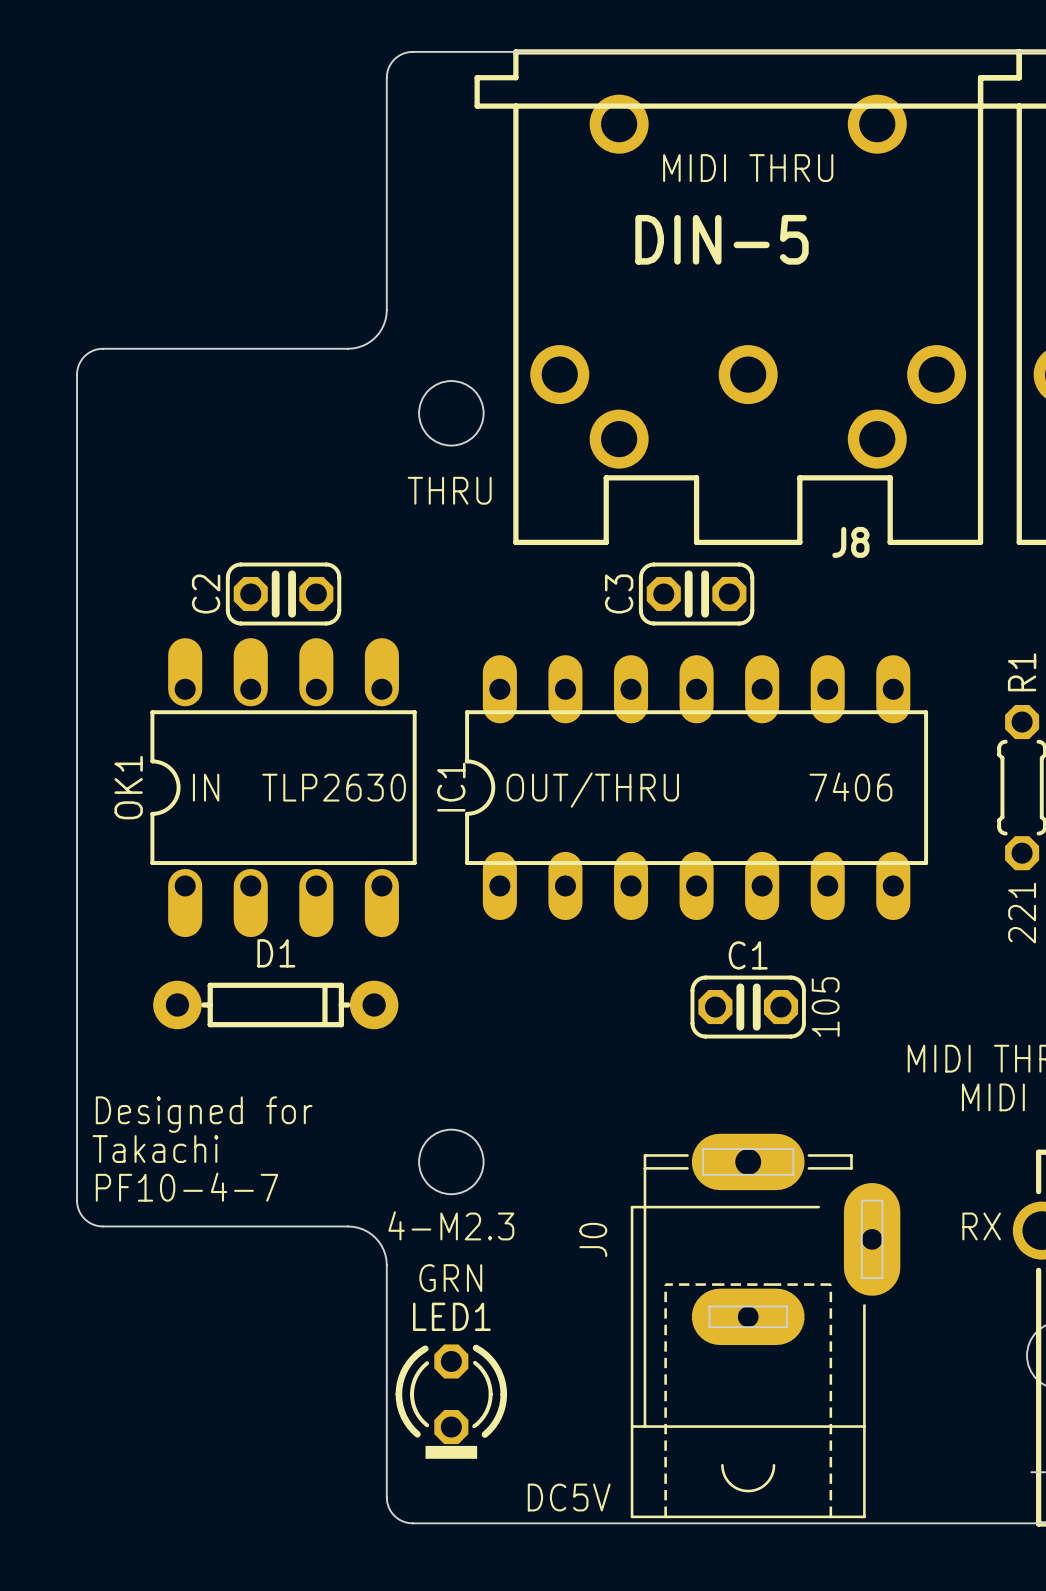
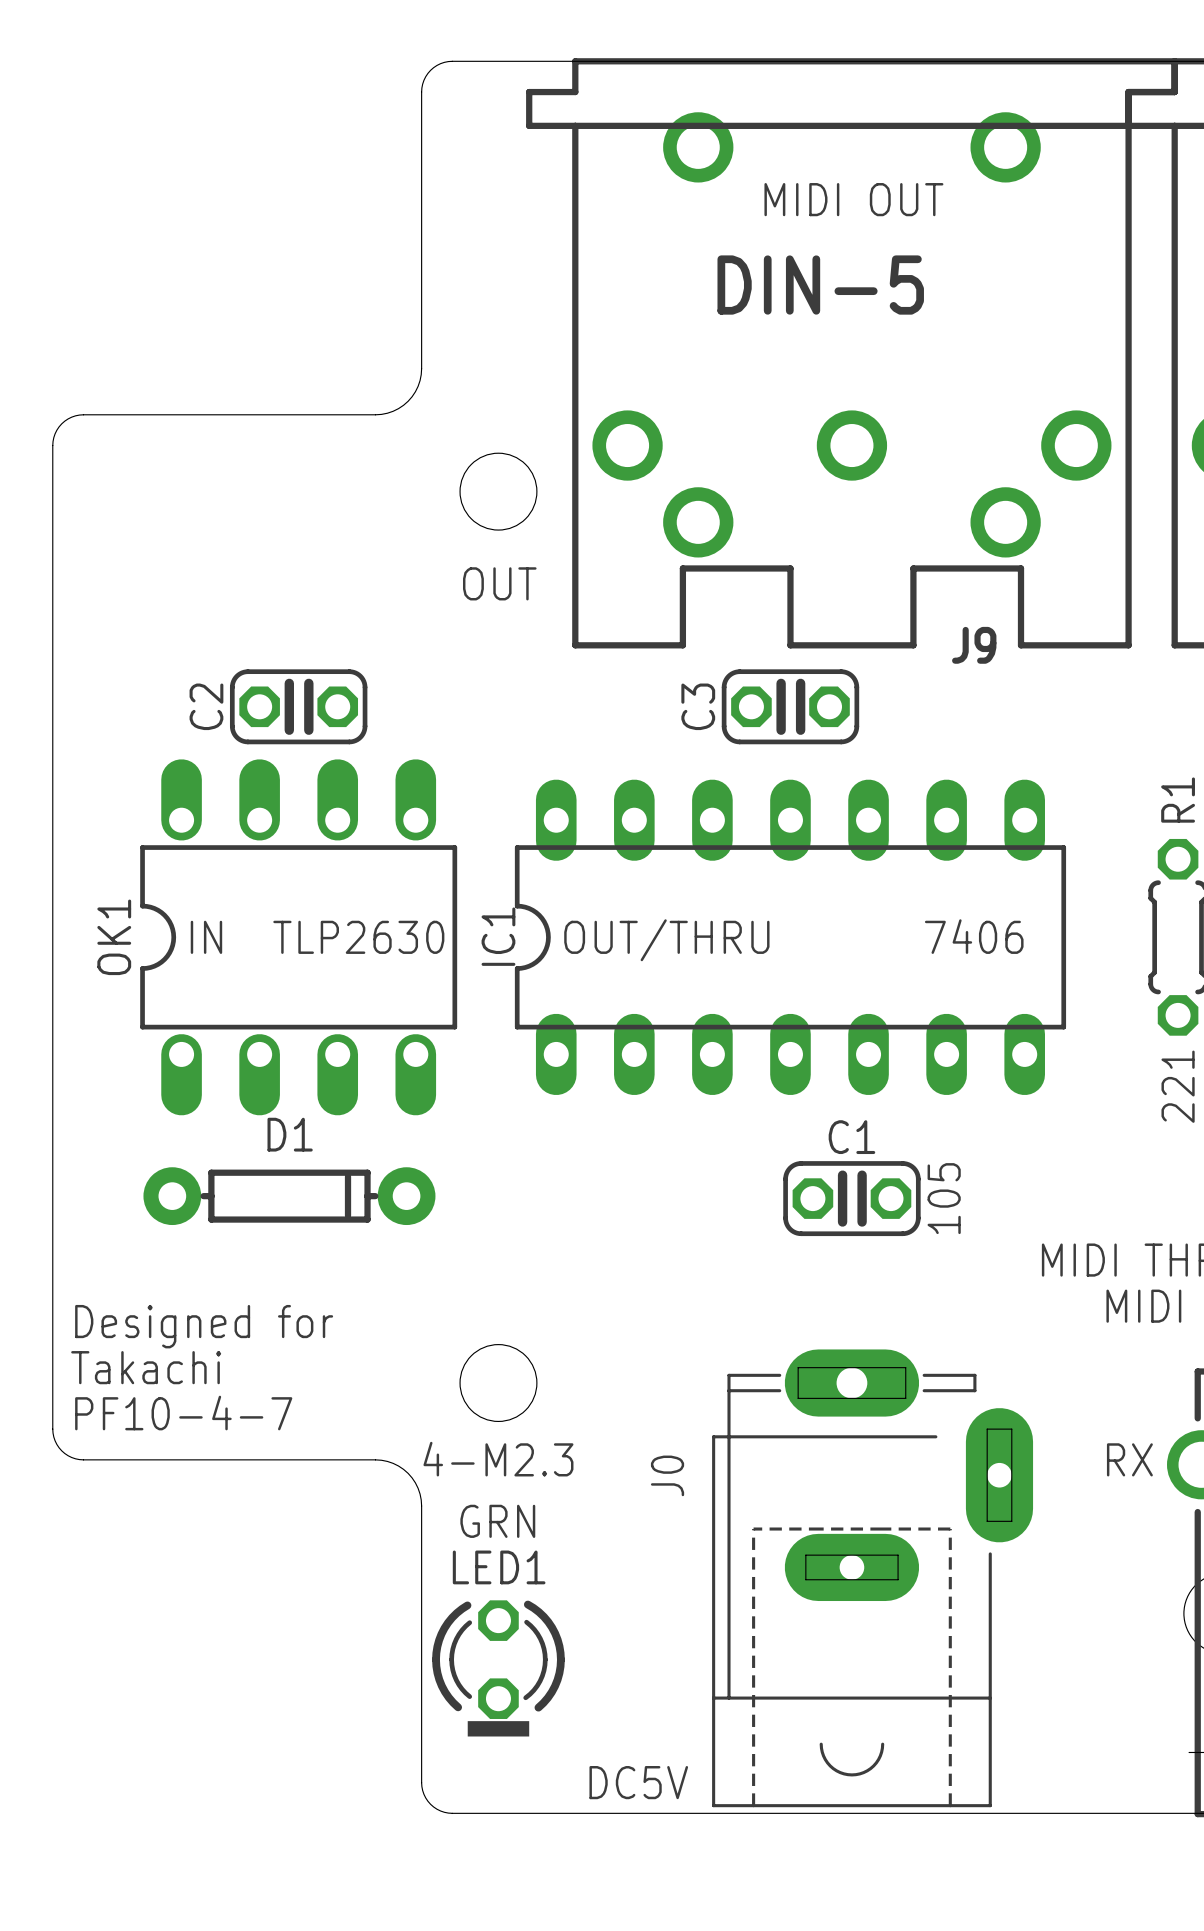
text: MIDI THRU (748, 168) -> MIDI OUT (853, 199)
text: THRU (449, 490) -> OUT (499, 583)
J8 name: J8 (850, 542) -> J9 (974, 645)

